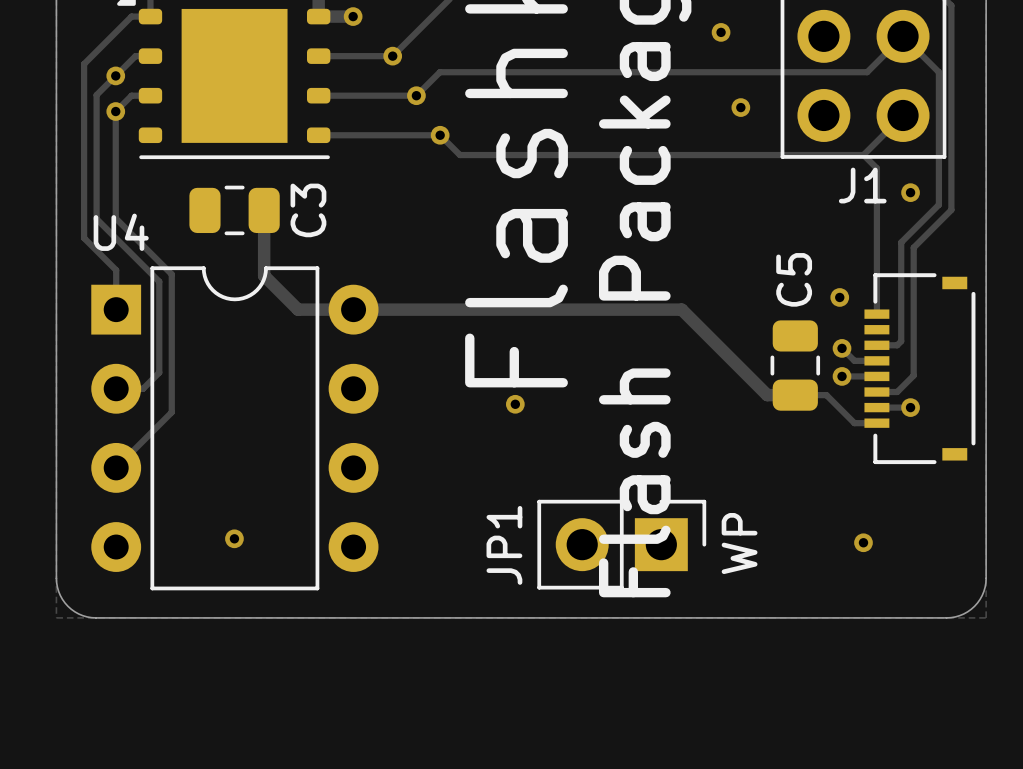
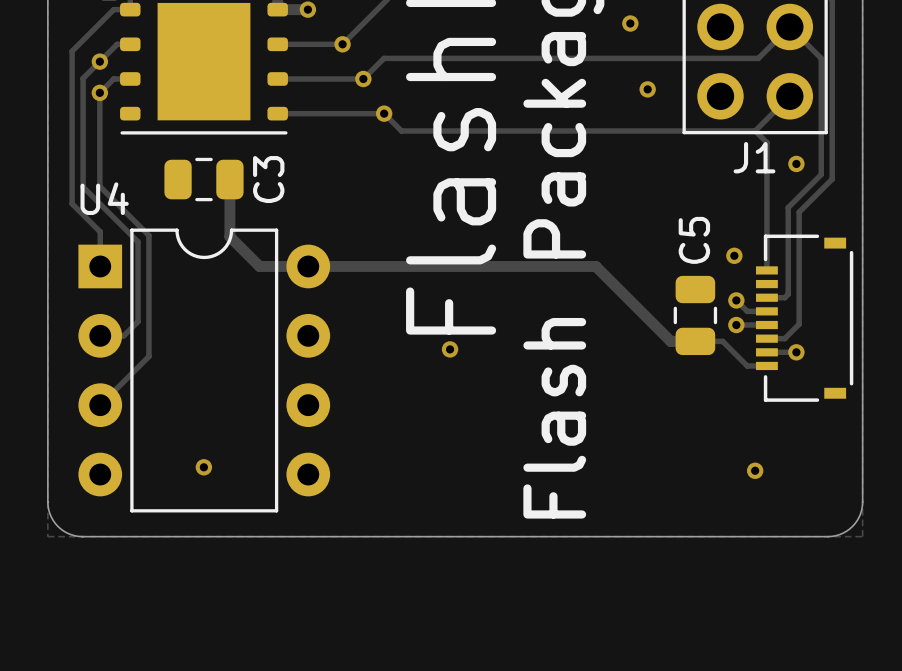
text: WP (739, 543) -> none
JP1: (621, 544) -> none

